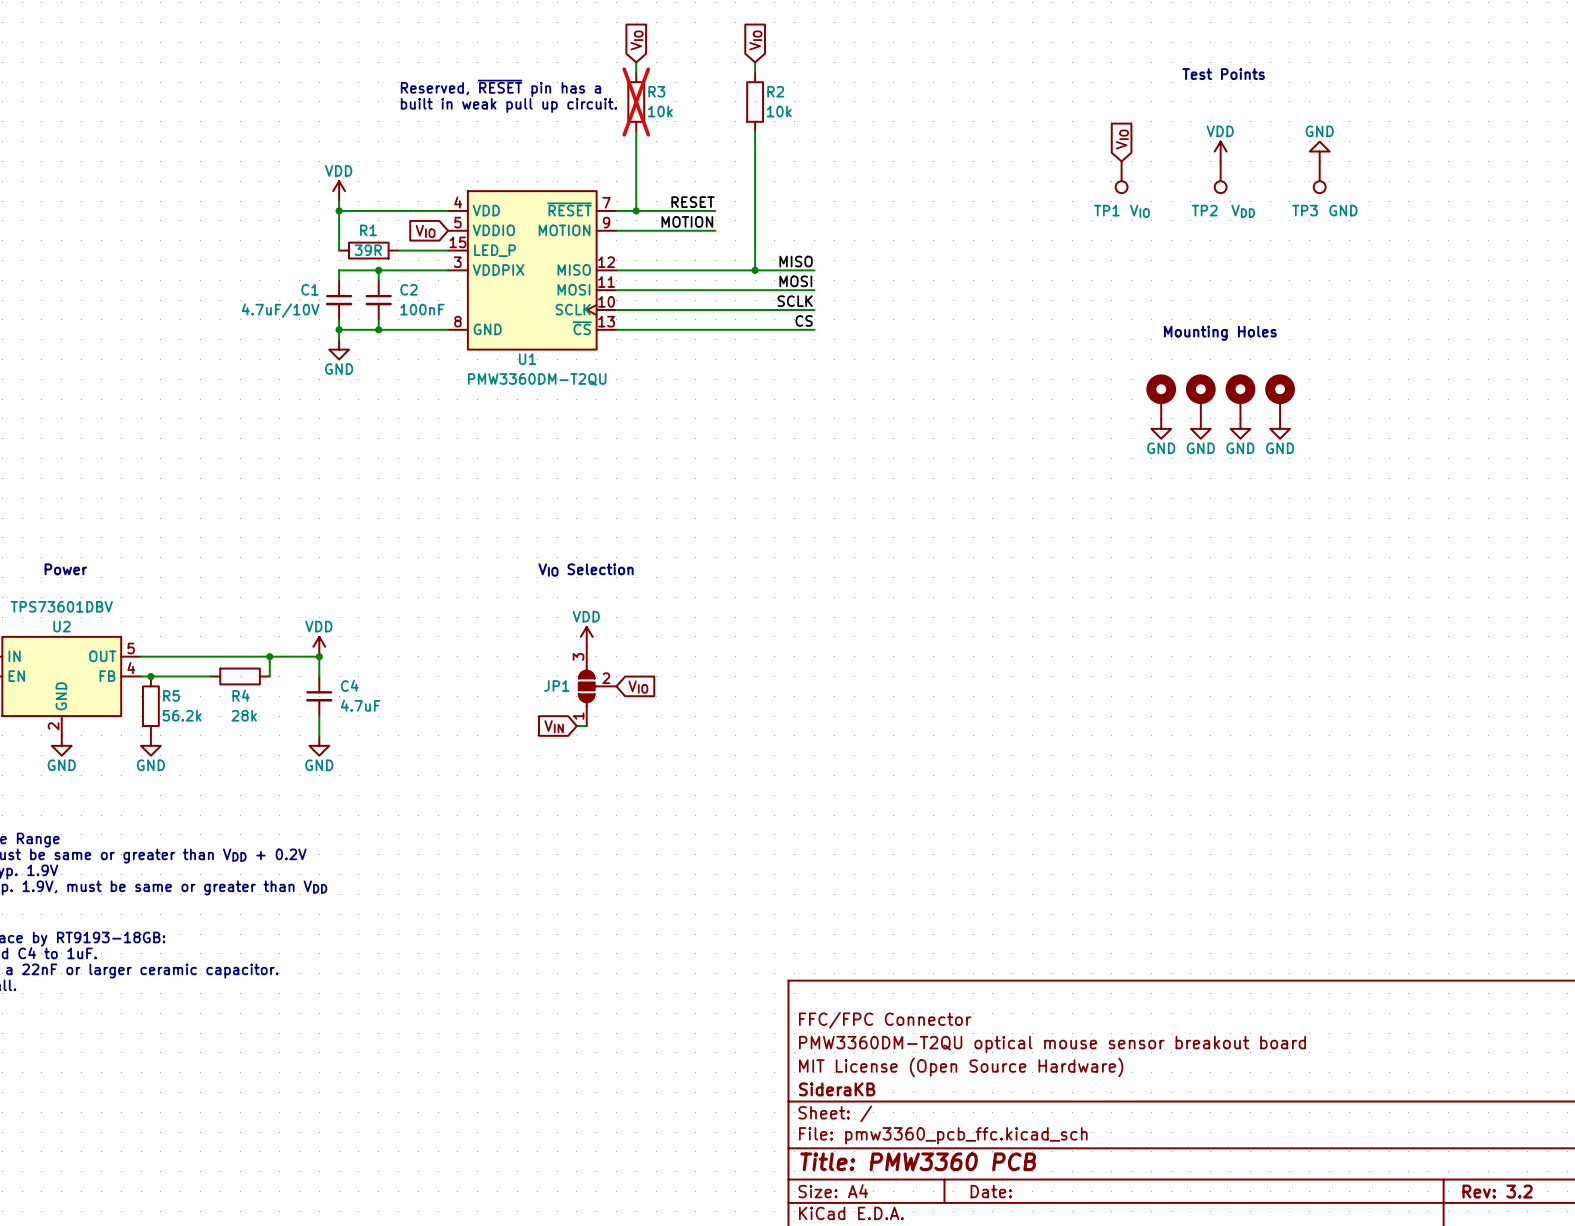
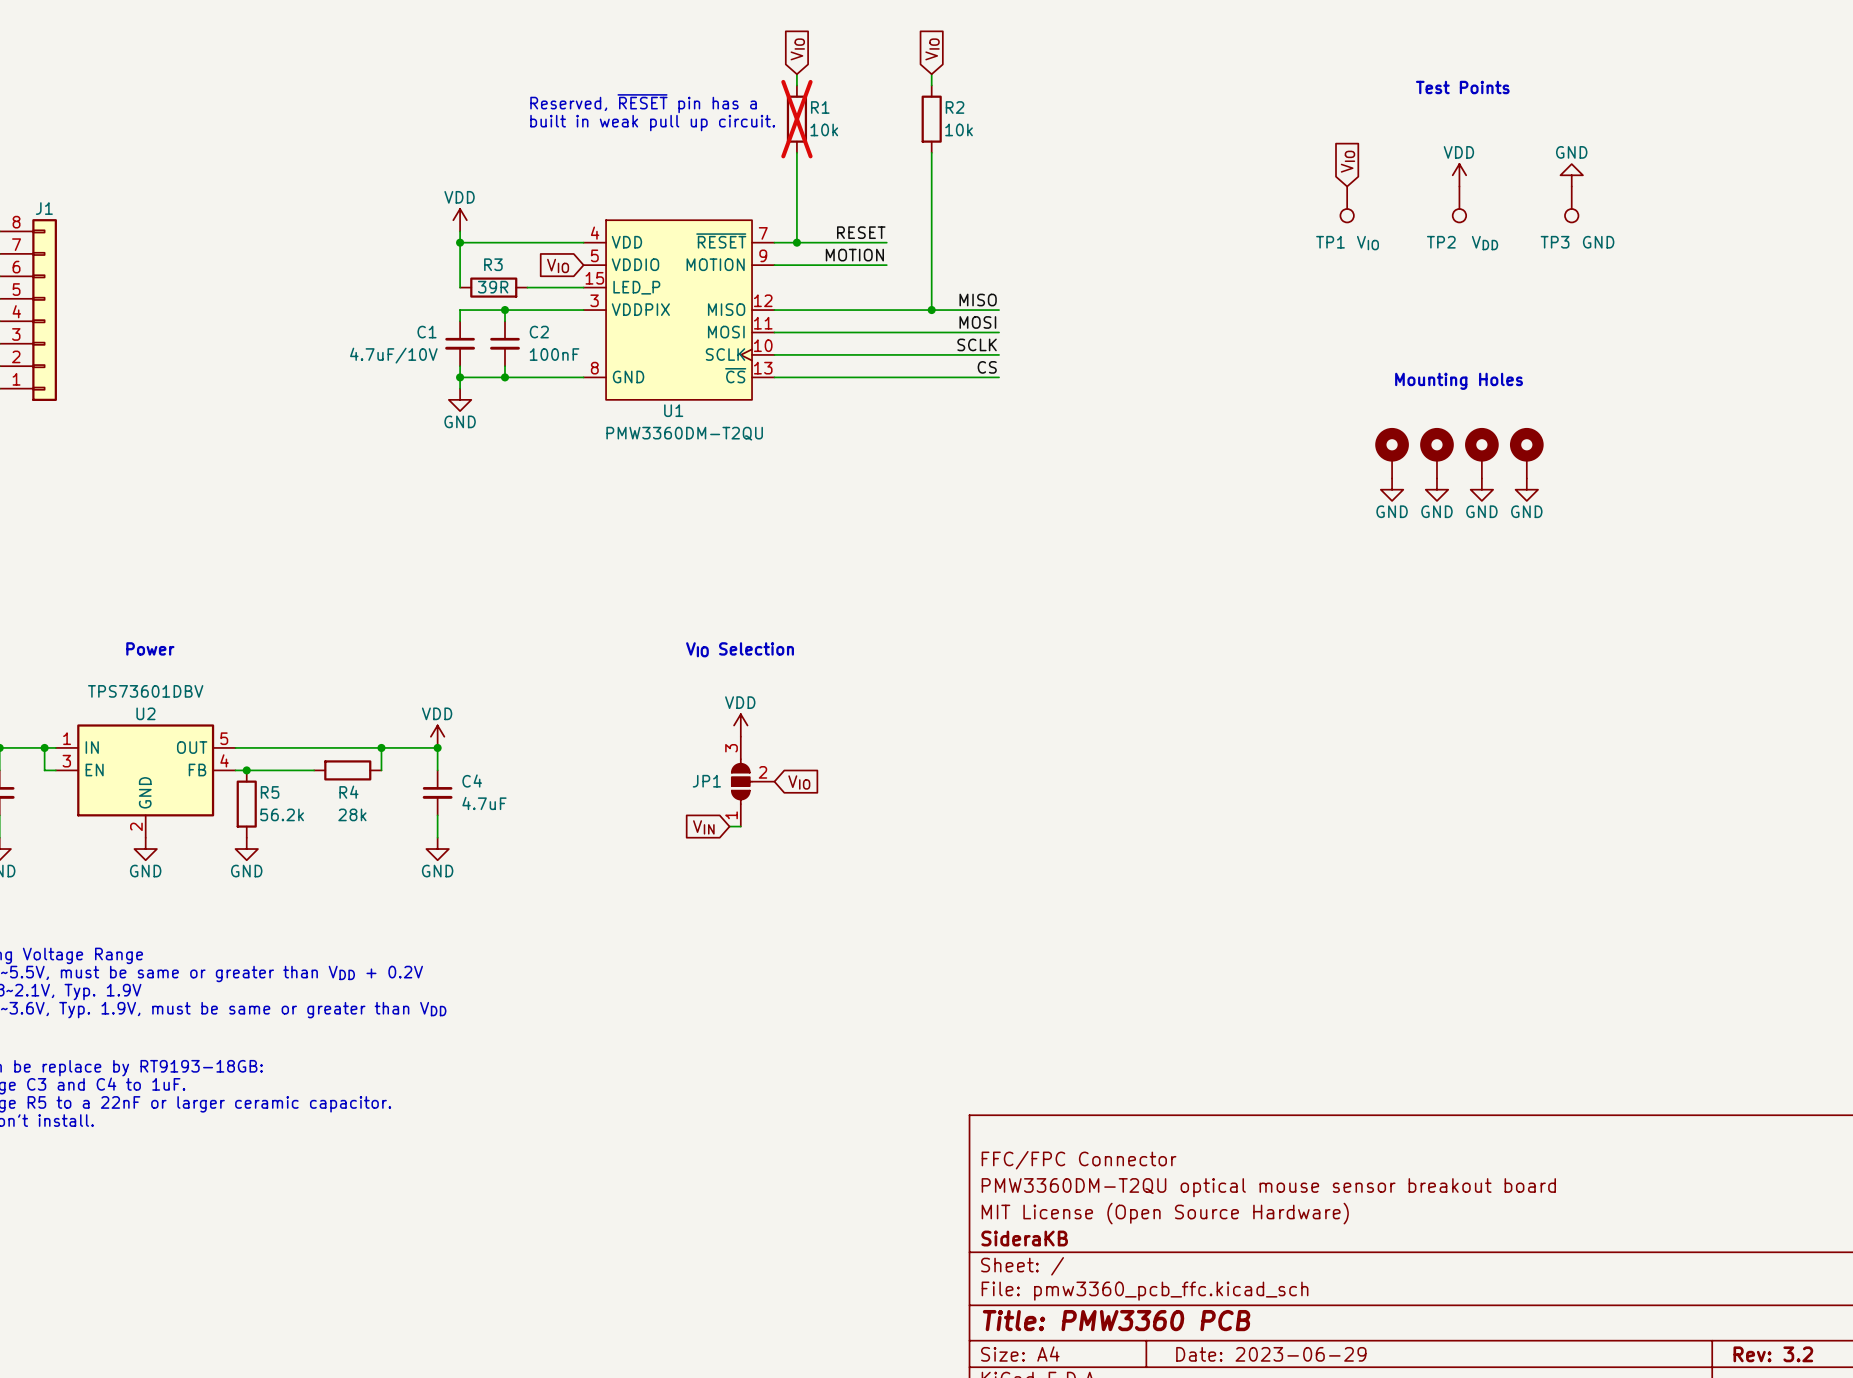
R3 name: R3 (656, 91) -> R1 (820, 107)
R1 name: R1 (368, 230) -> R3 (493, 264)
title block: Date: (991, 1191) -> Date: 2023-06-29 (1271, 1354)

